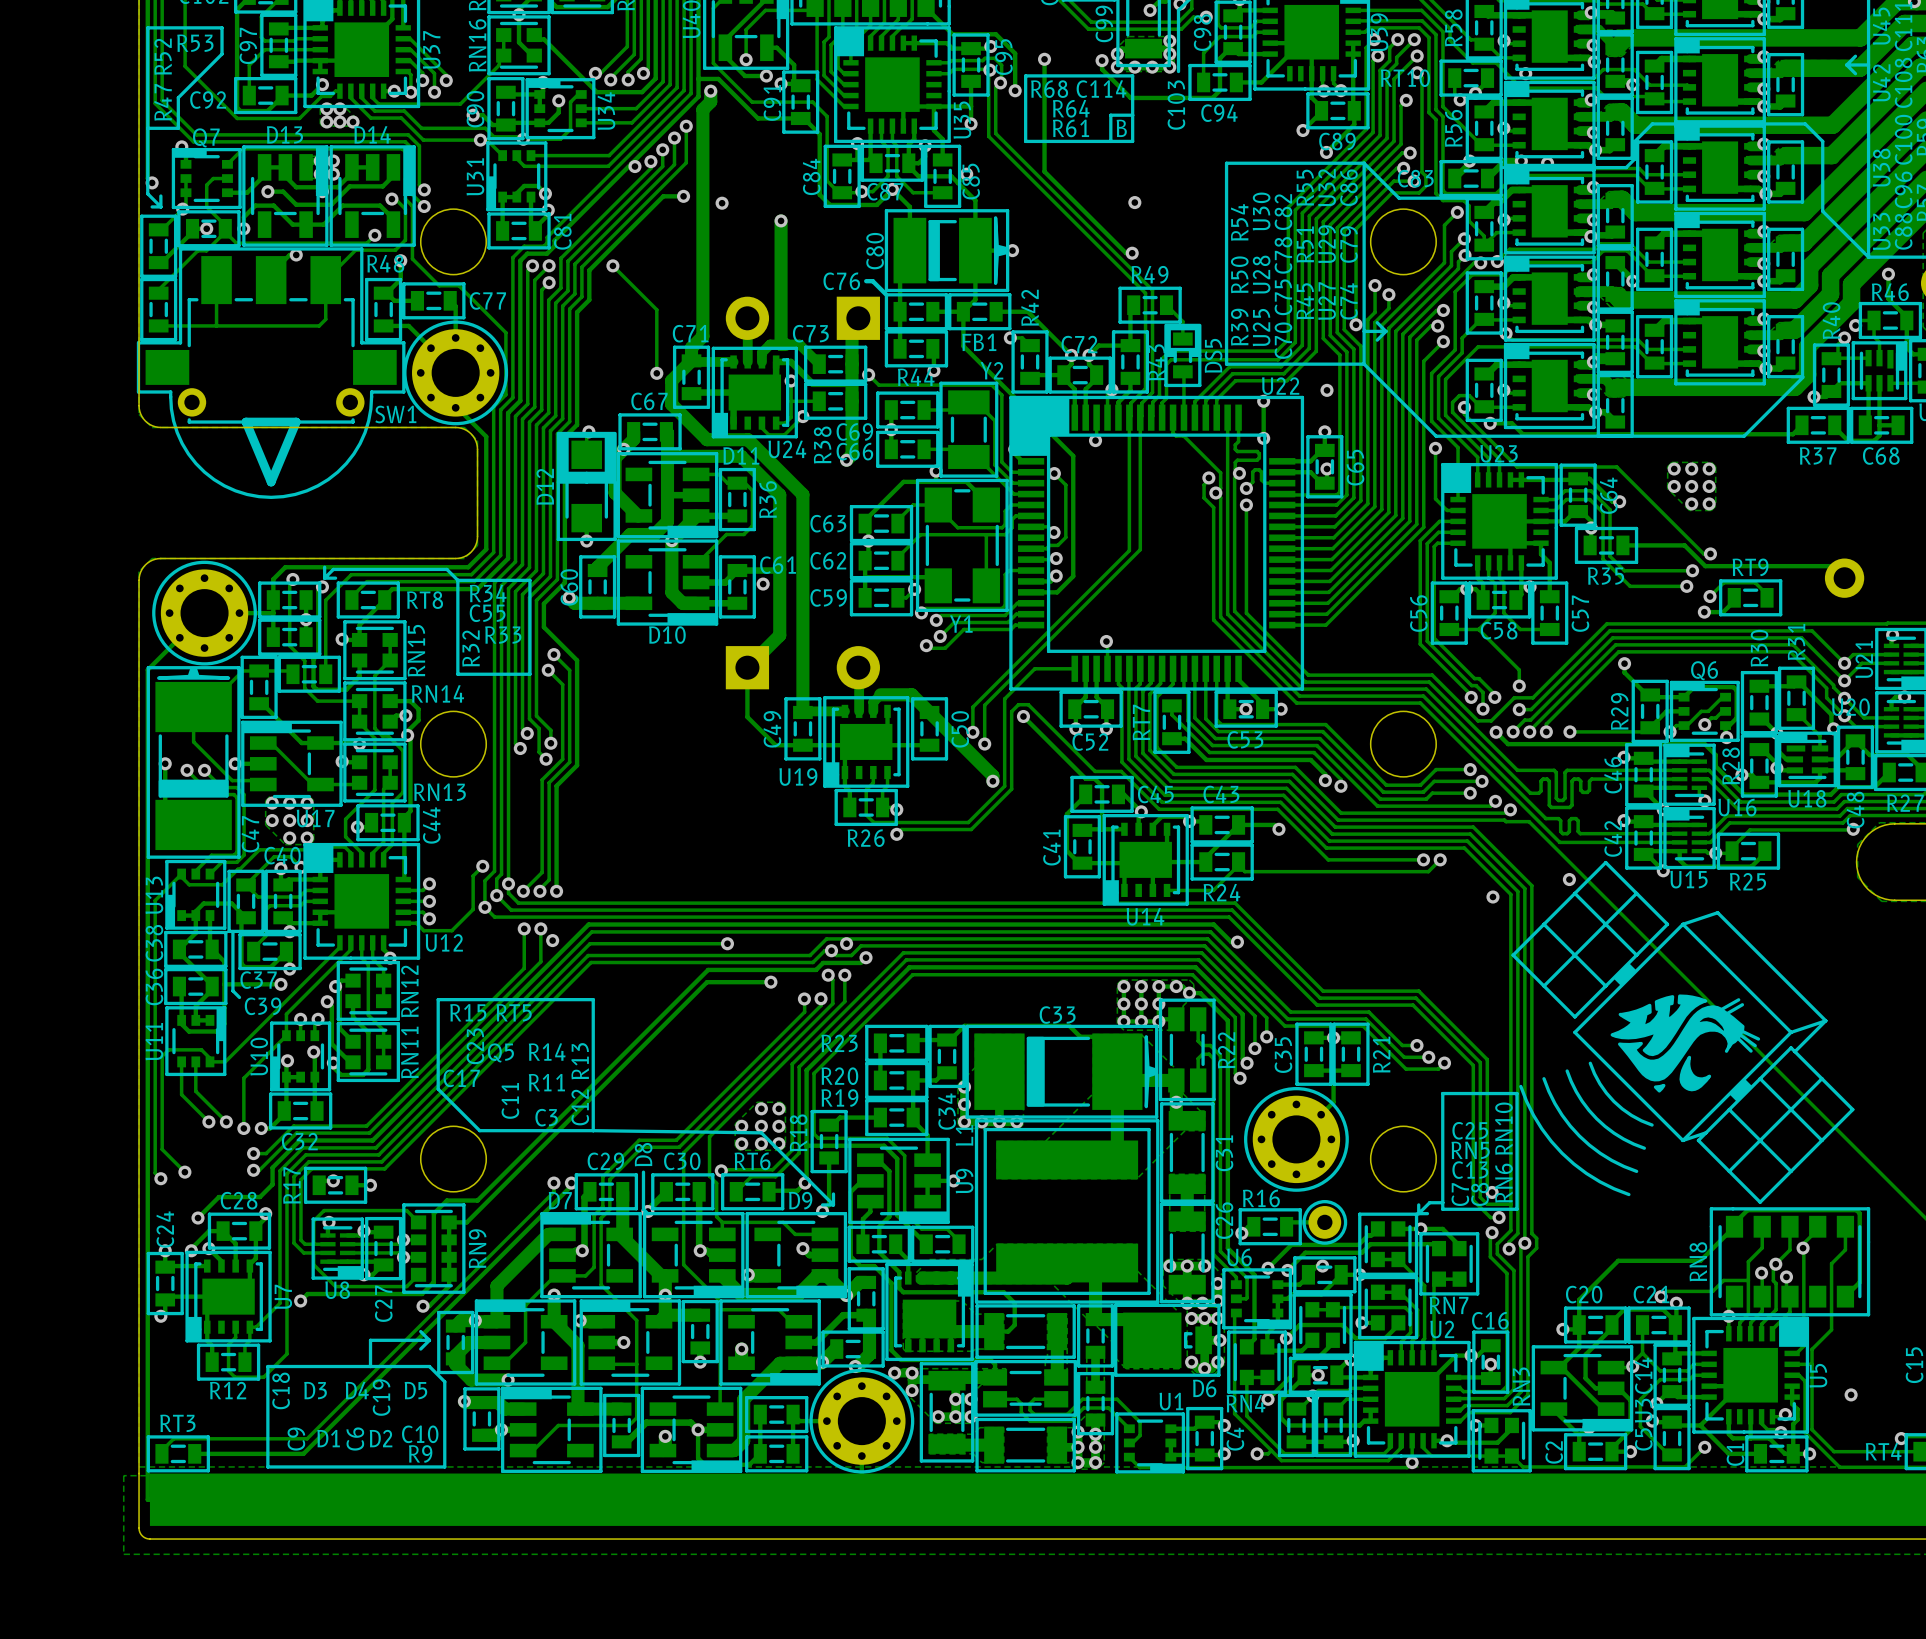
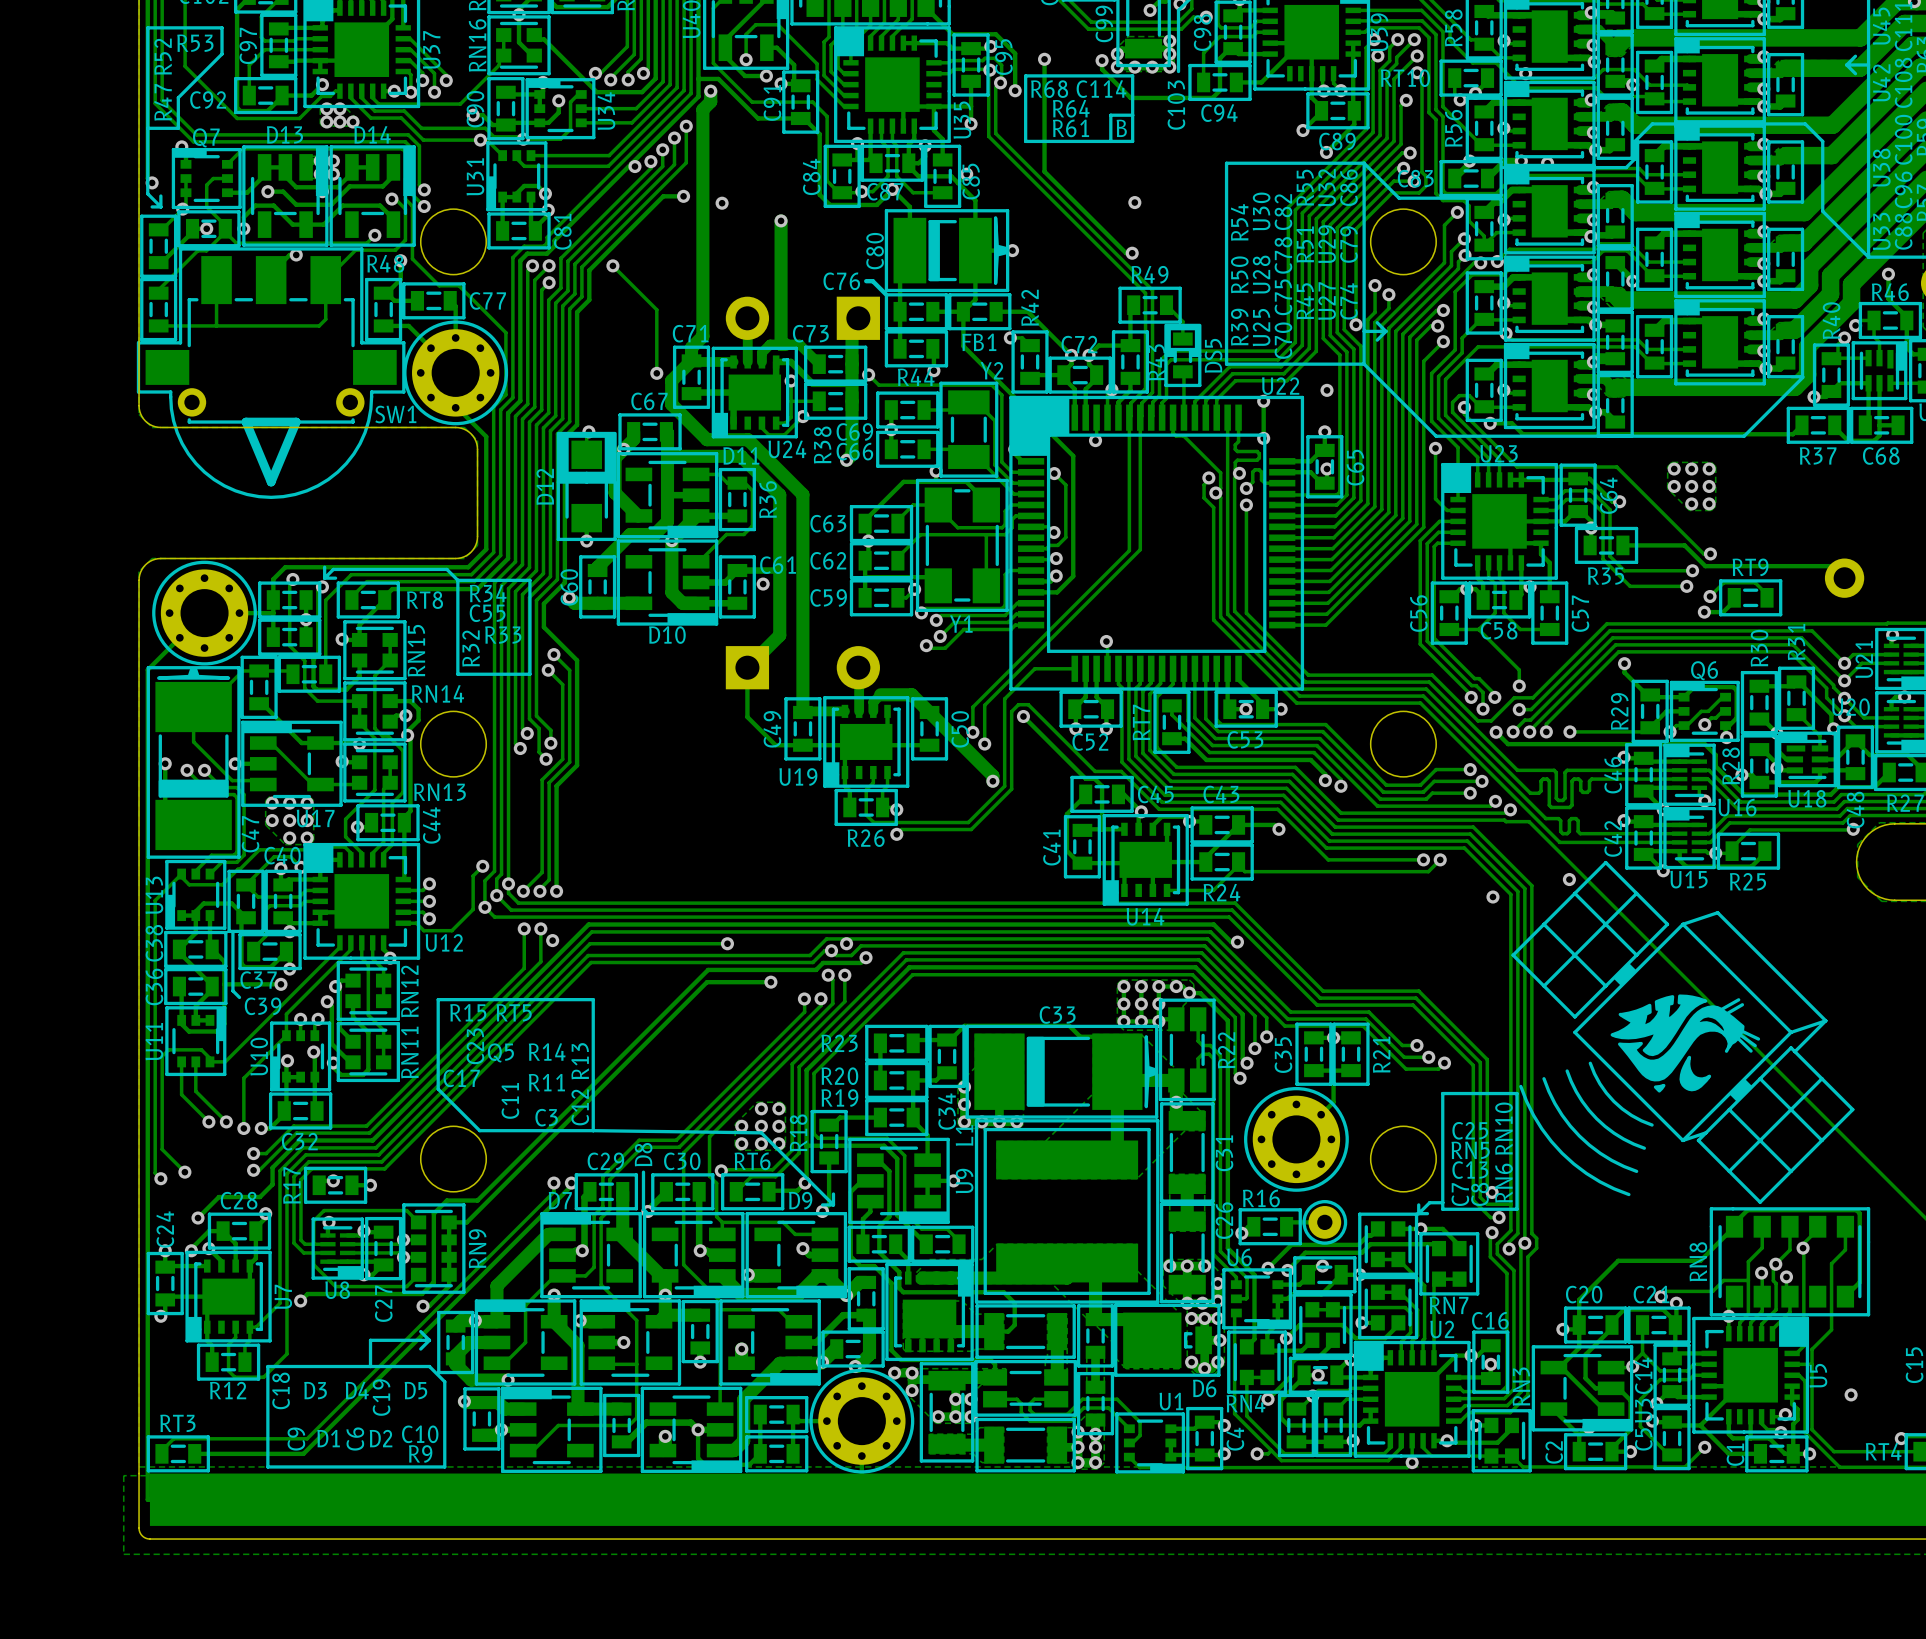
track: (746, 34) (746, 29) (765, 10) (810, 10) (815, 6) (817, 7) (817, 63) -> (746, 34) (755, 24) (778, 24) (817, 63)

